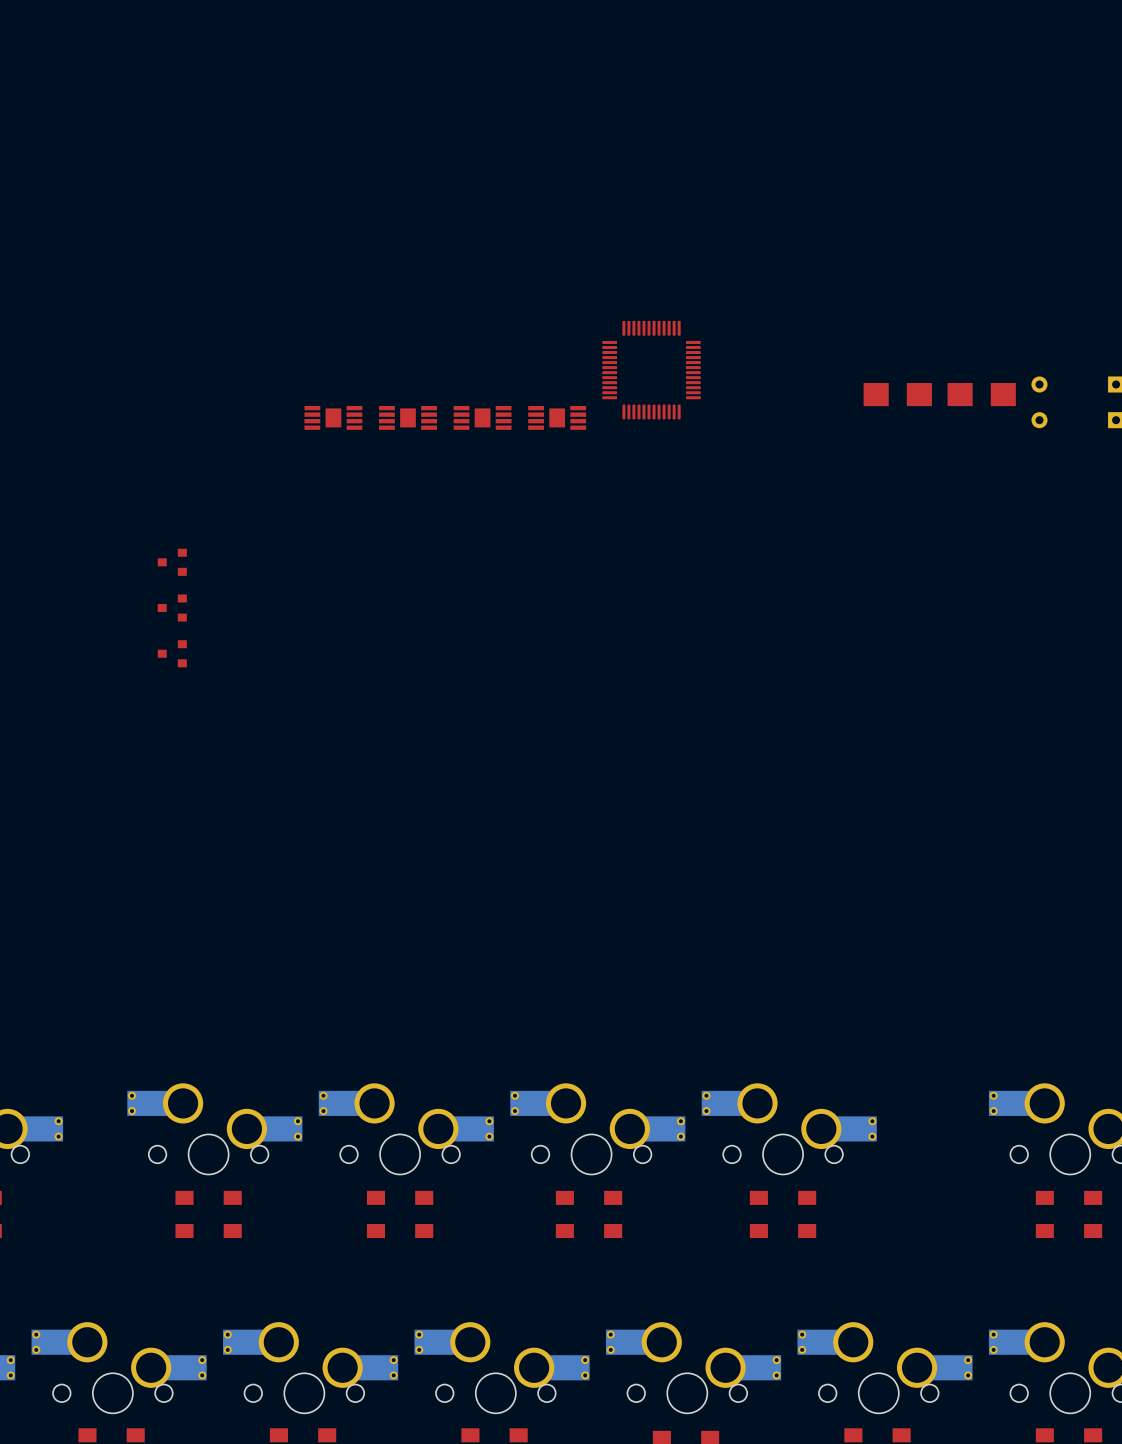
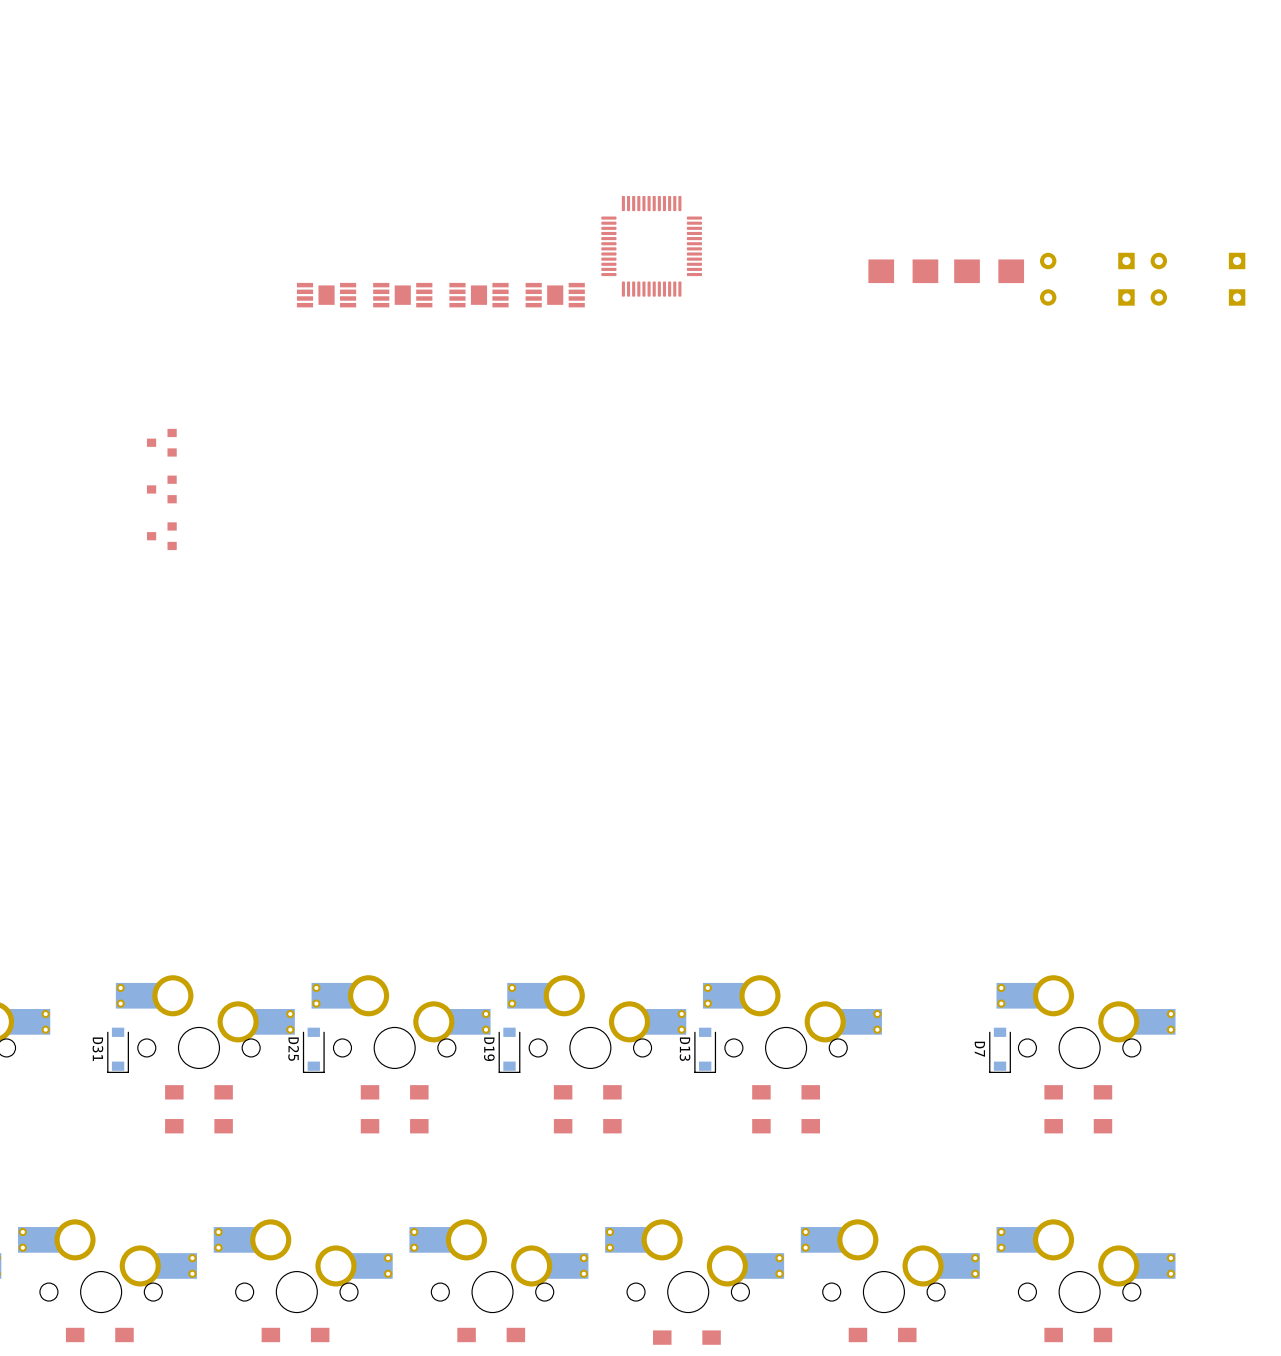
D31: none -> (118, 1050)
D25: none -> (313, 1050)
D19: none -> (509, 1050)
D13: none -> (705, 1050)
D7: none -> (1000, 1050)

